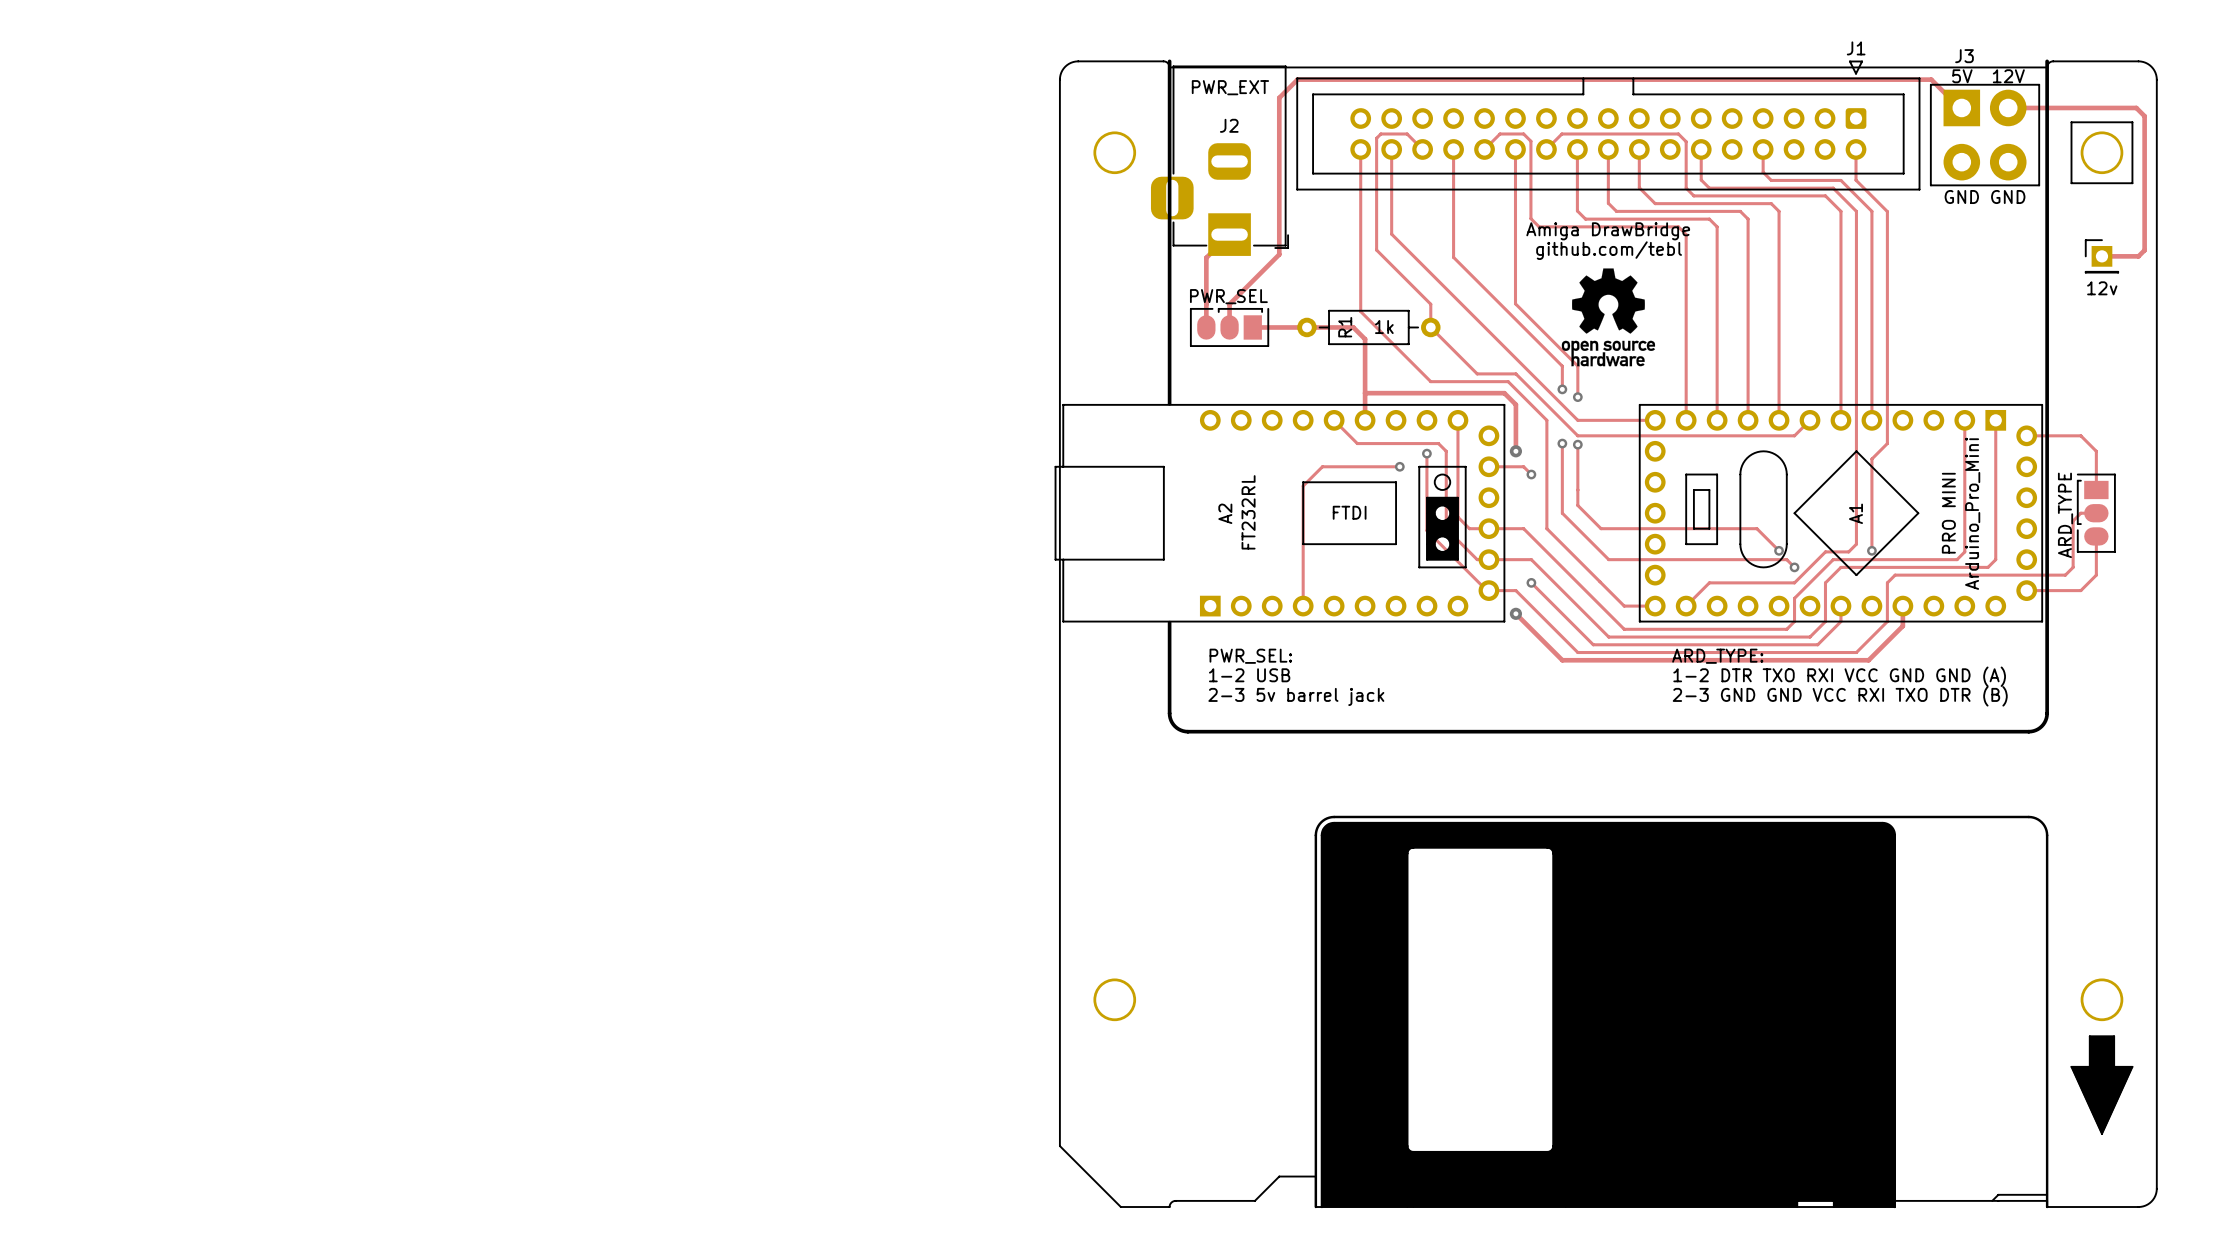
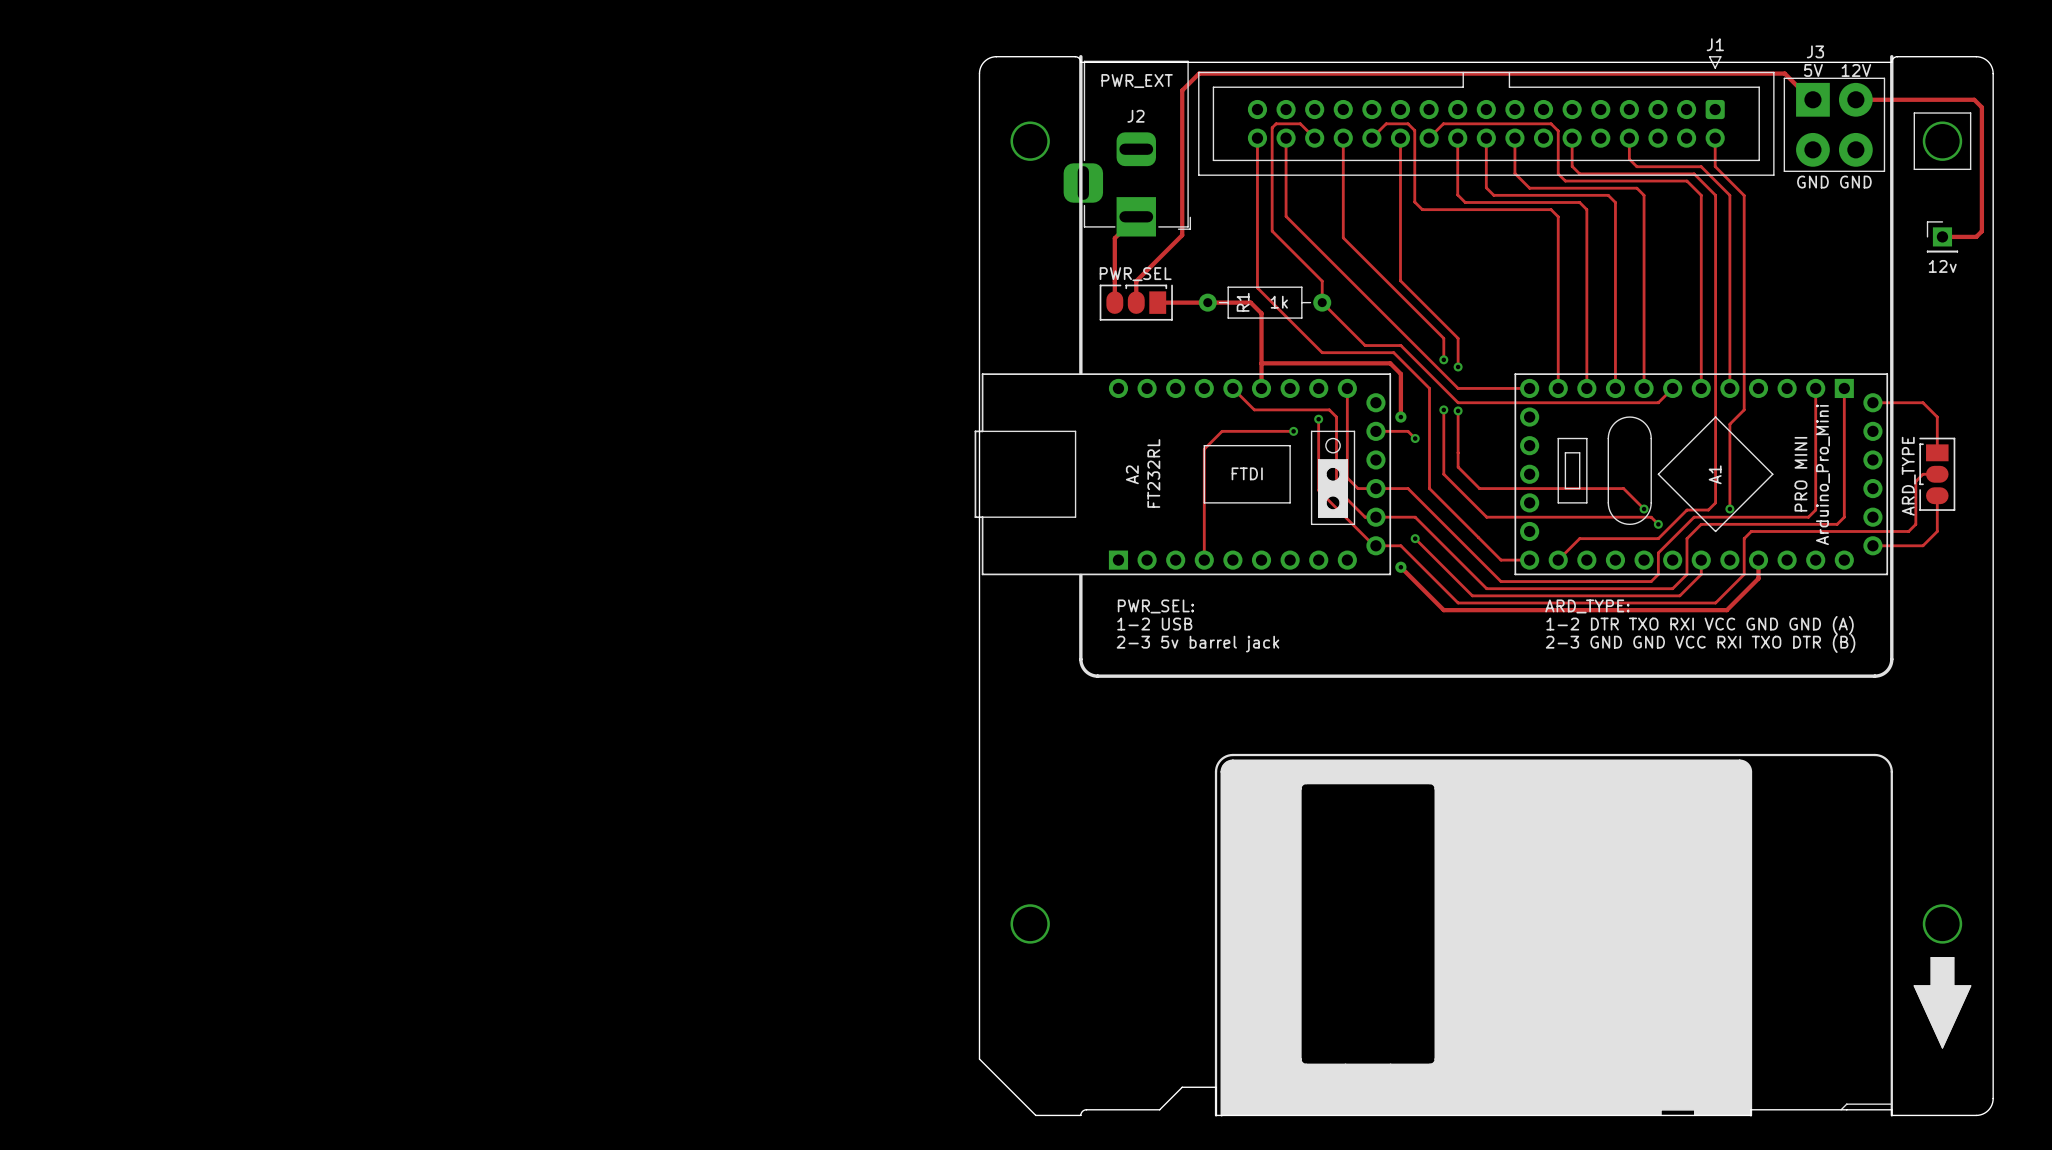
text: Amiga DrawBridge (1608, 231) -> none
text: github.com/tebl (1609, 250) -> none
drawing: [1561, 268, 1656, 367] -> none

